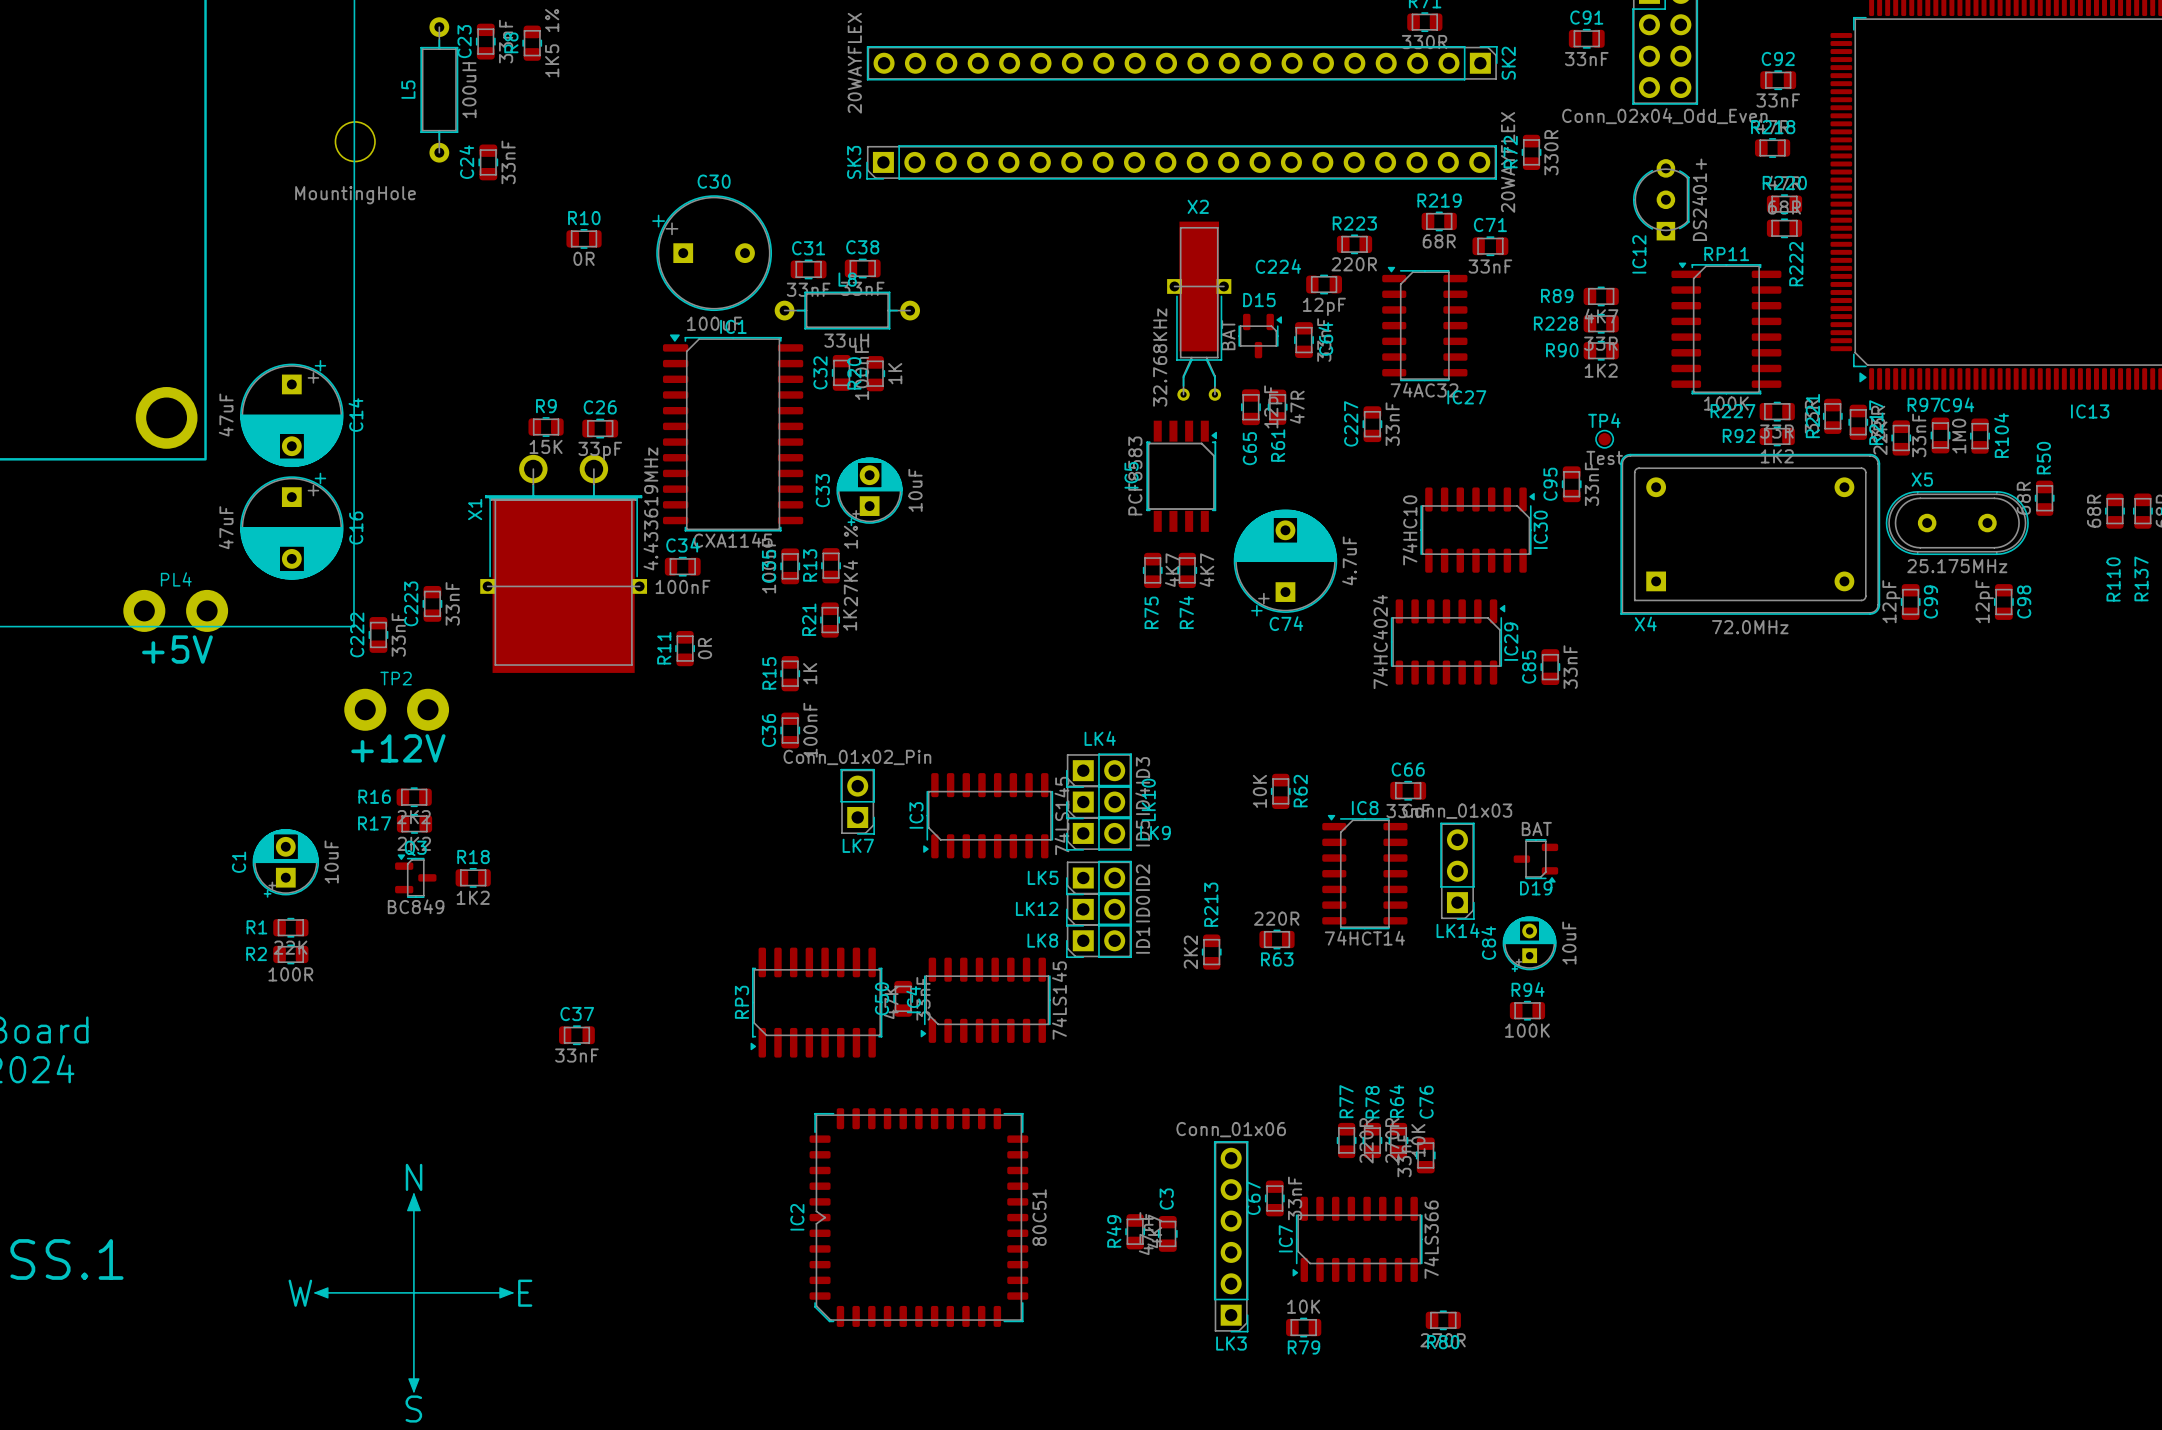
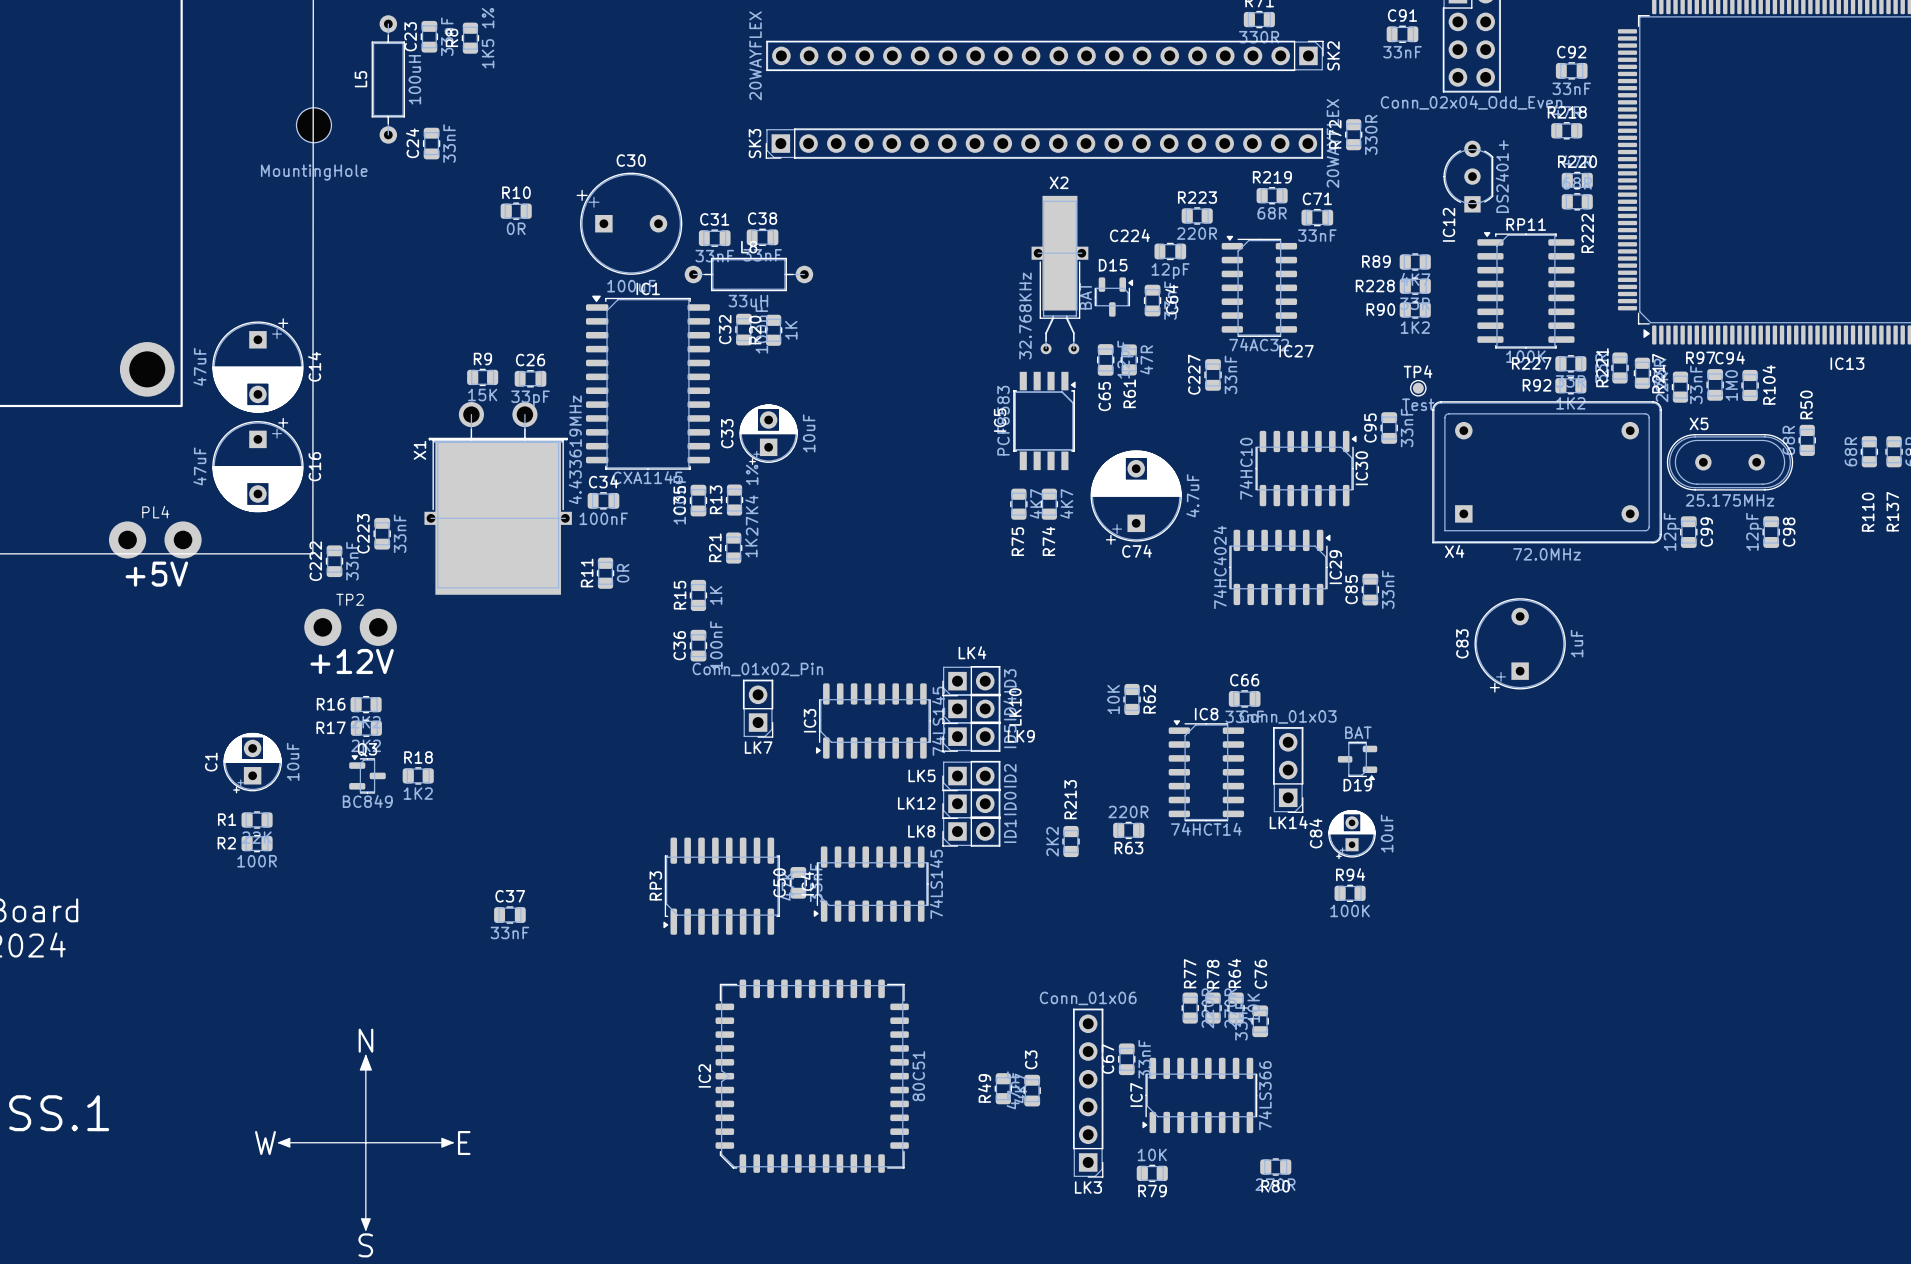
C83: none -> 1uF (1520, 645)

